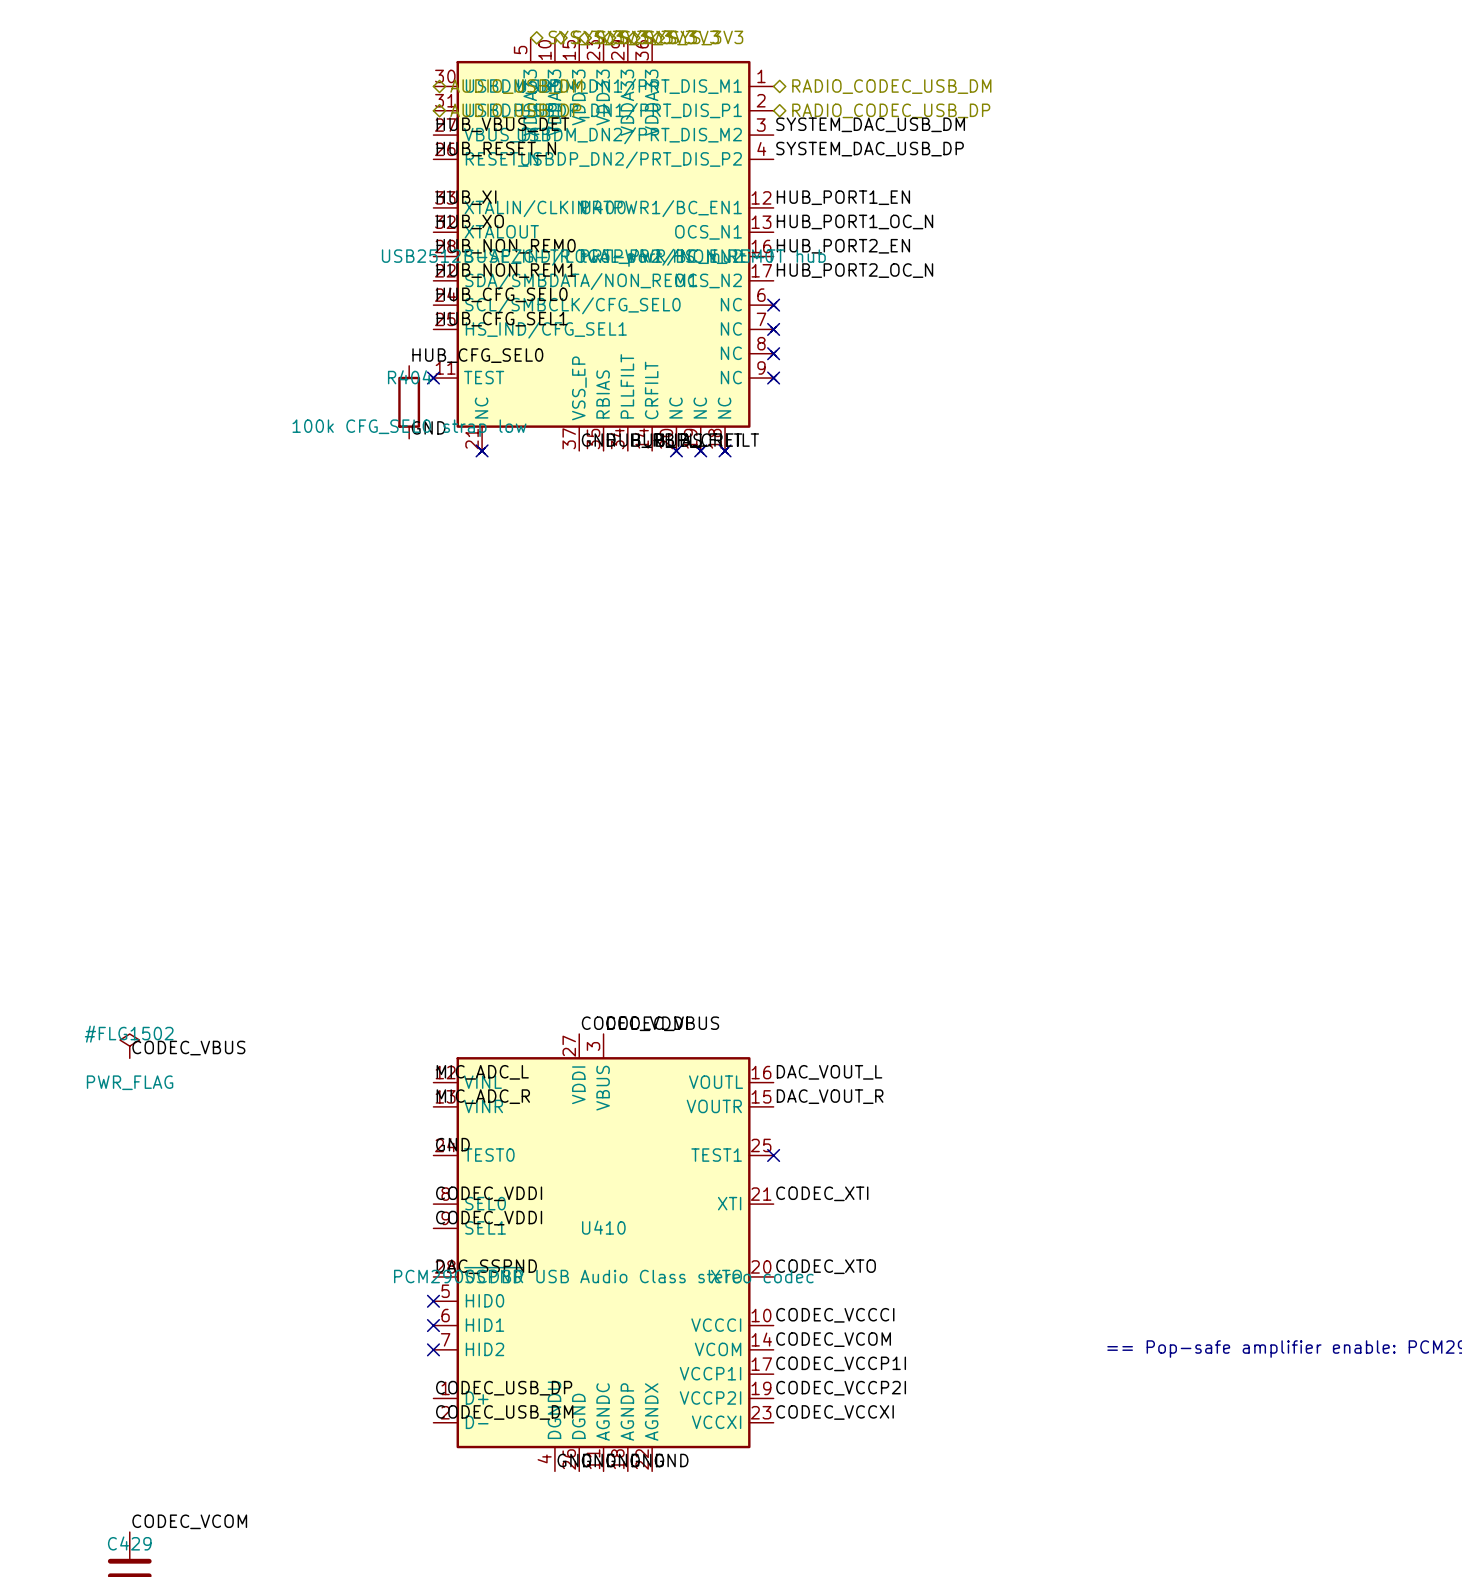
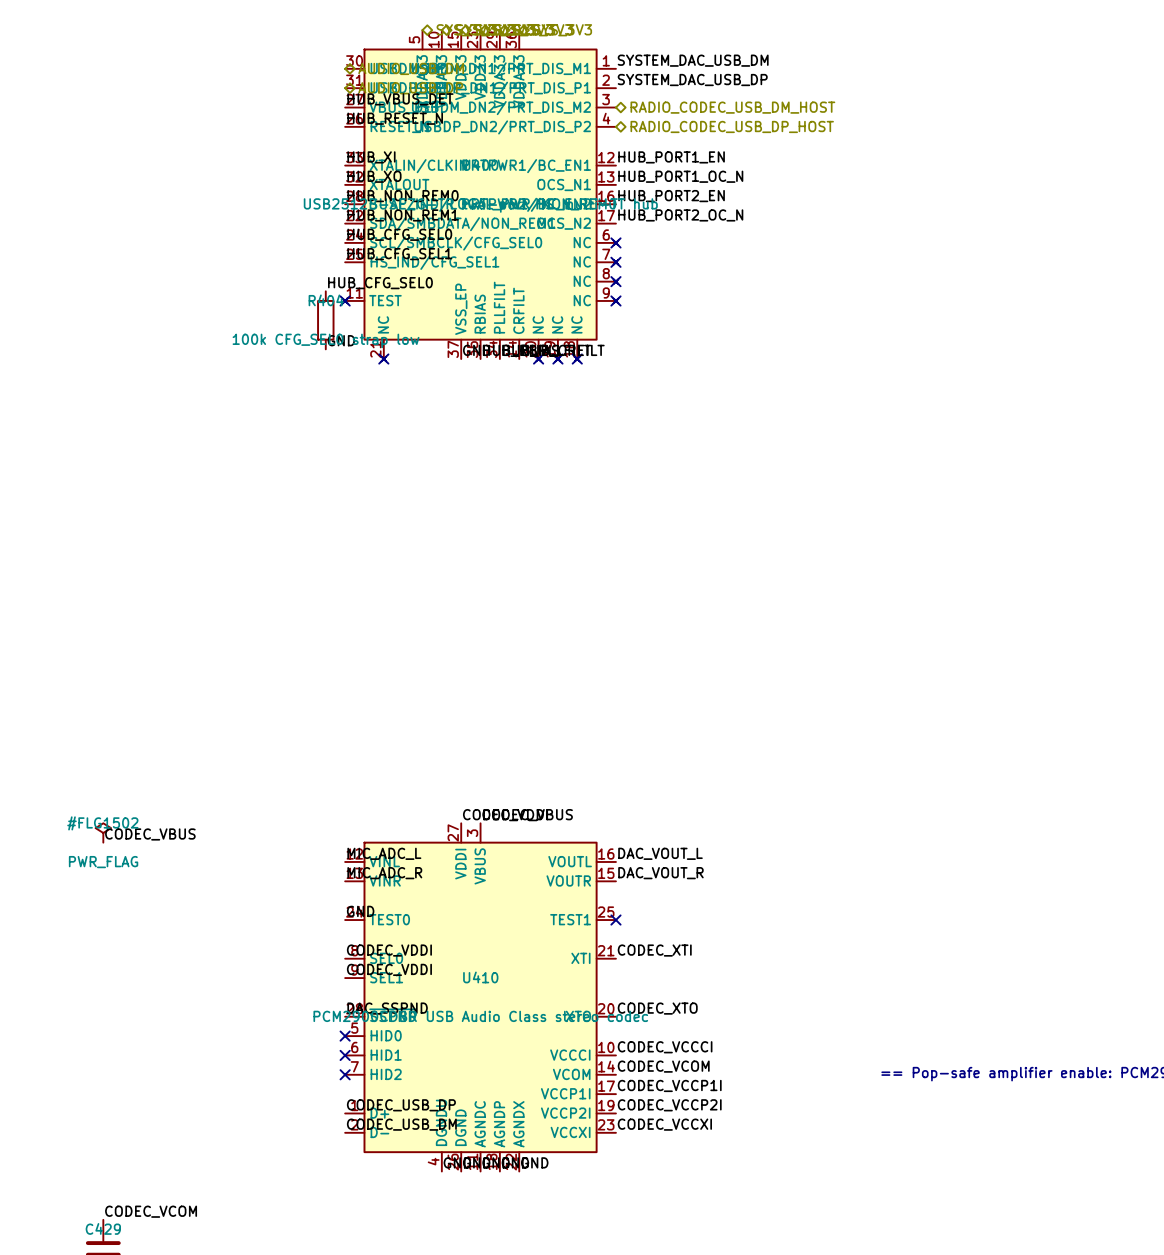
hierarchical label: RADIO_CODEC_USB_DM (891, 86) -> none
hierarchical label: RADIO_CODEC_USB_DP (891, 110) -> RADIO_CODEC_USB_DM_HOST (732, 107)
label position: SYSTEM_DAC_USB_DM (870, 124) -> SYSTEM_DAC_USB_DM (693, 60)
label position: SYSTEM_DAC_USB_DP (870, 149) -> SYSTEM_DAC_USB_DP (692, 80)
hierarchical label: none -> RADIO_CODEC_USB_DP_HOST (732, 126)

